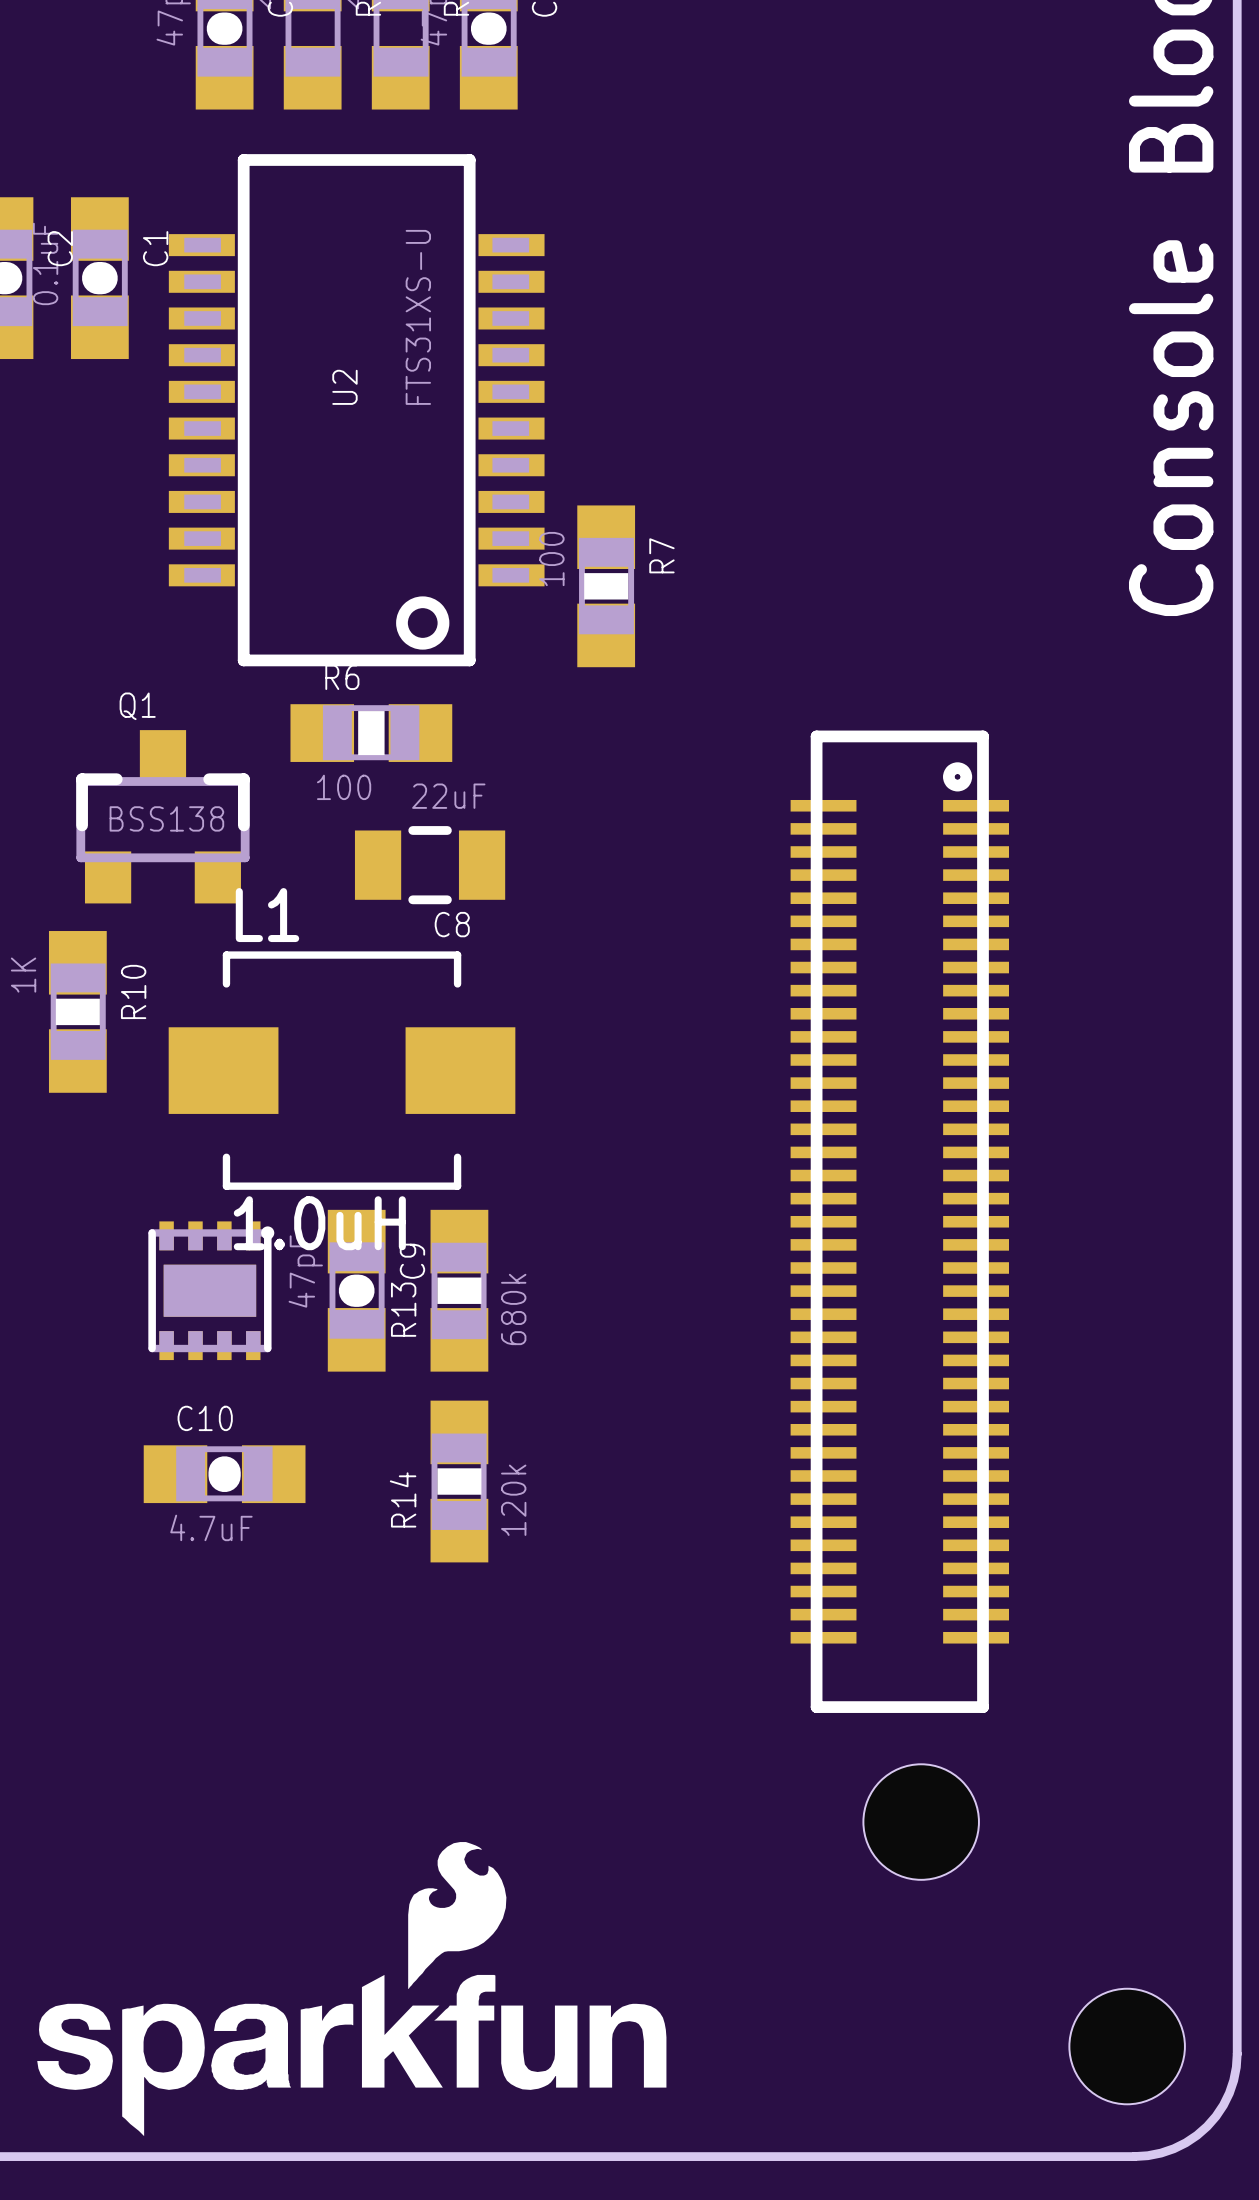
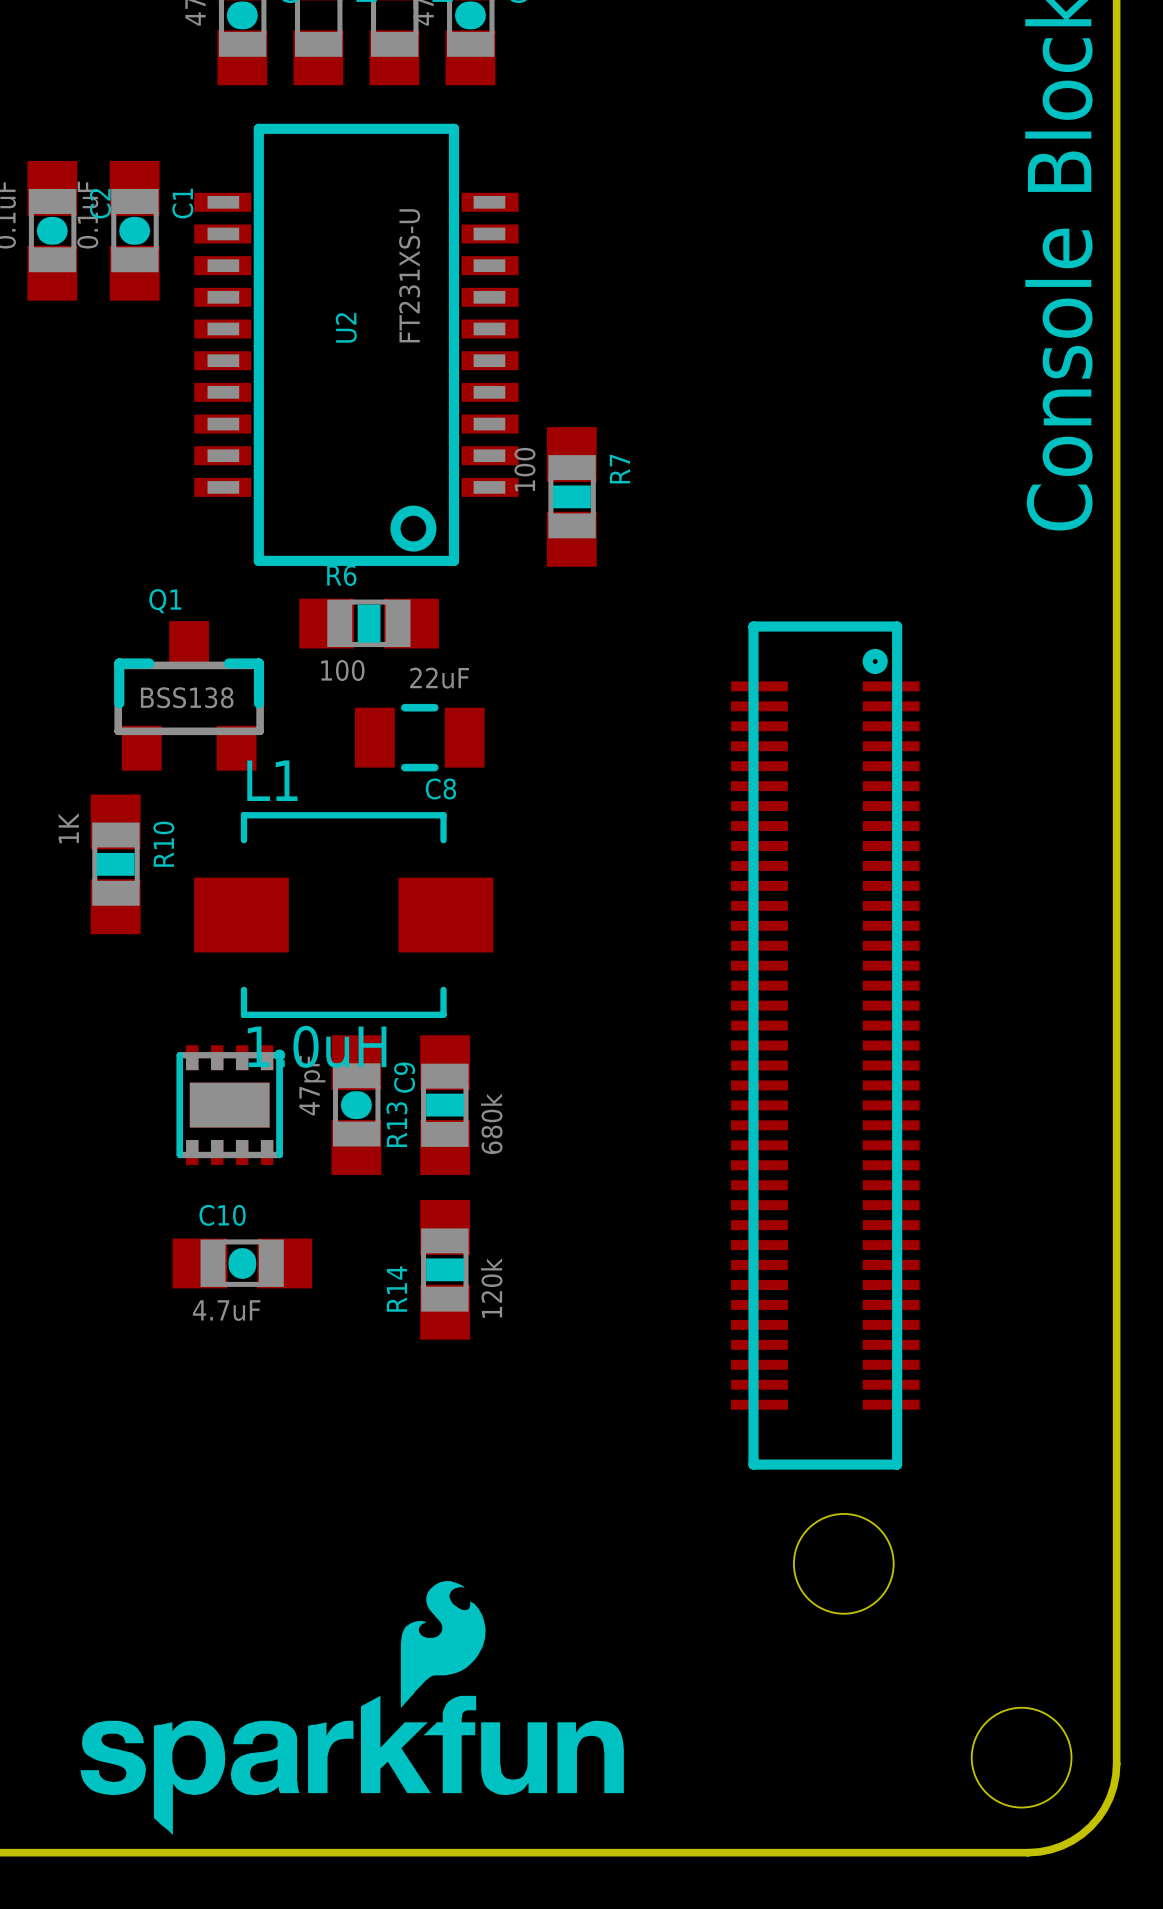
U2 value: FTS31XS-U (418, 317) -> FT231XS-U (409, 275)

